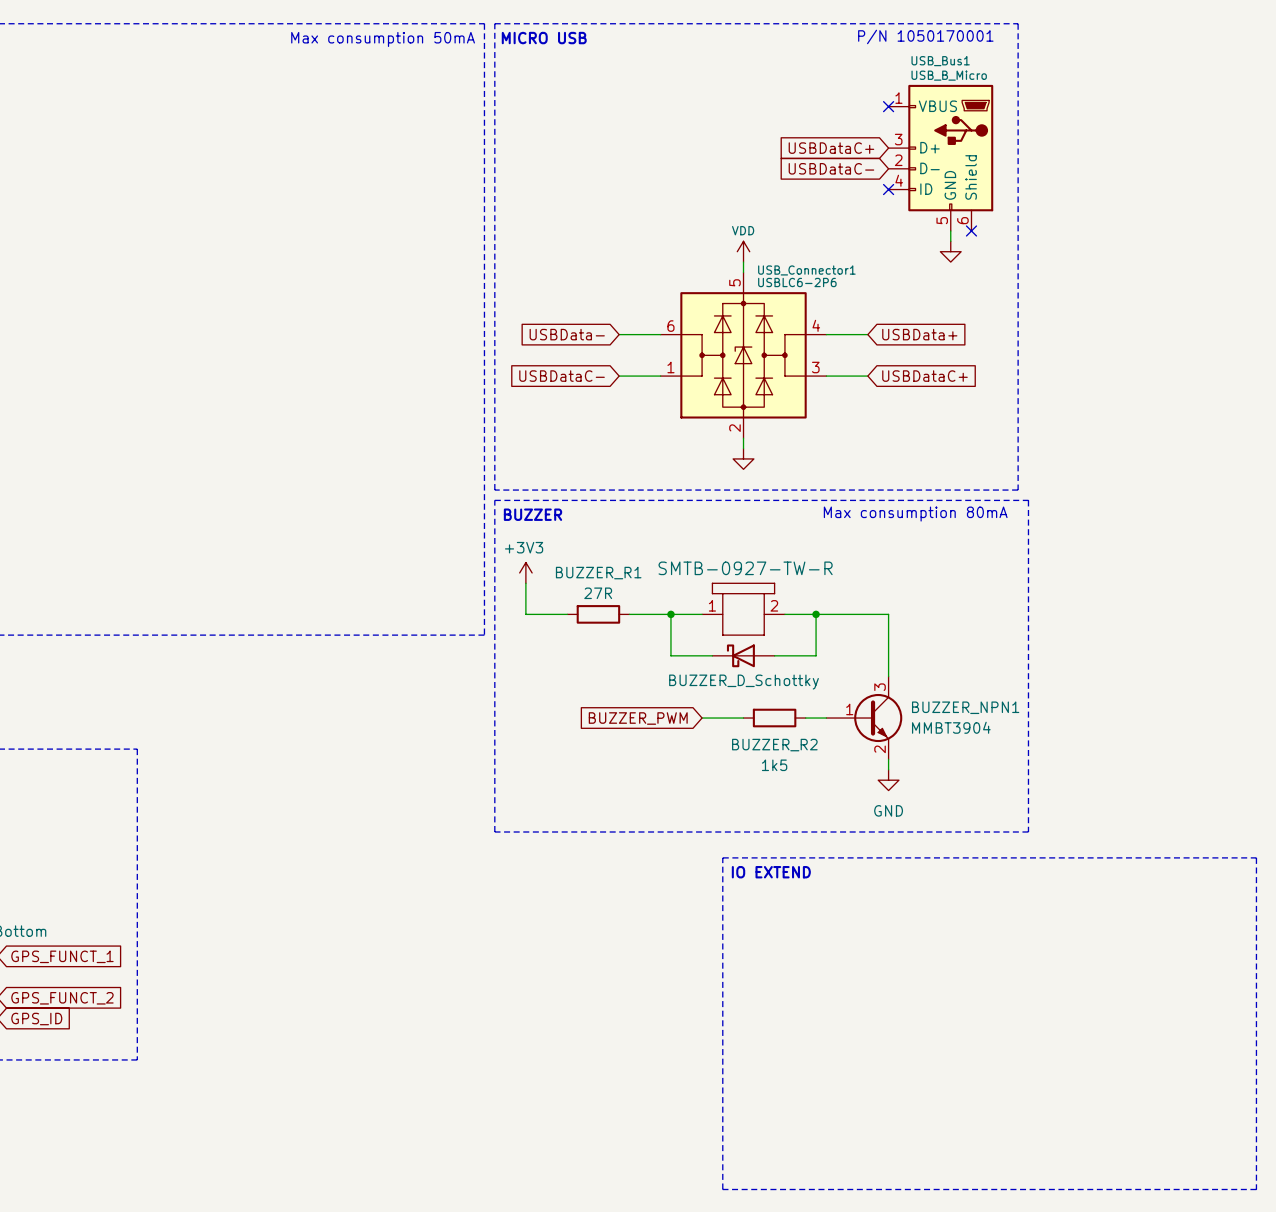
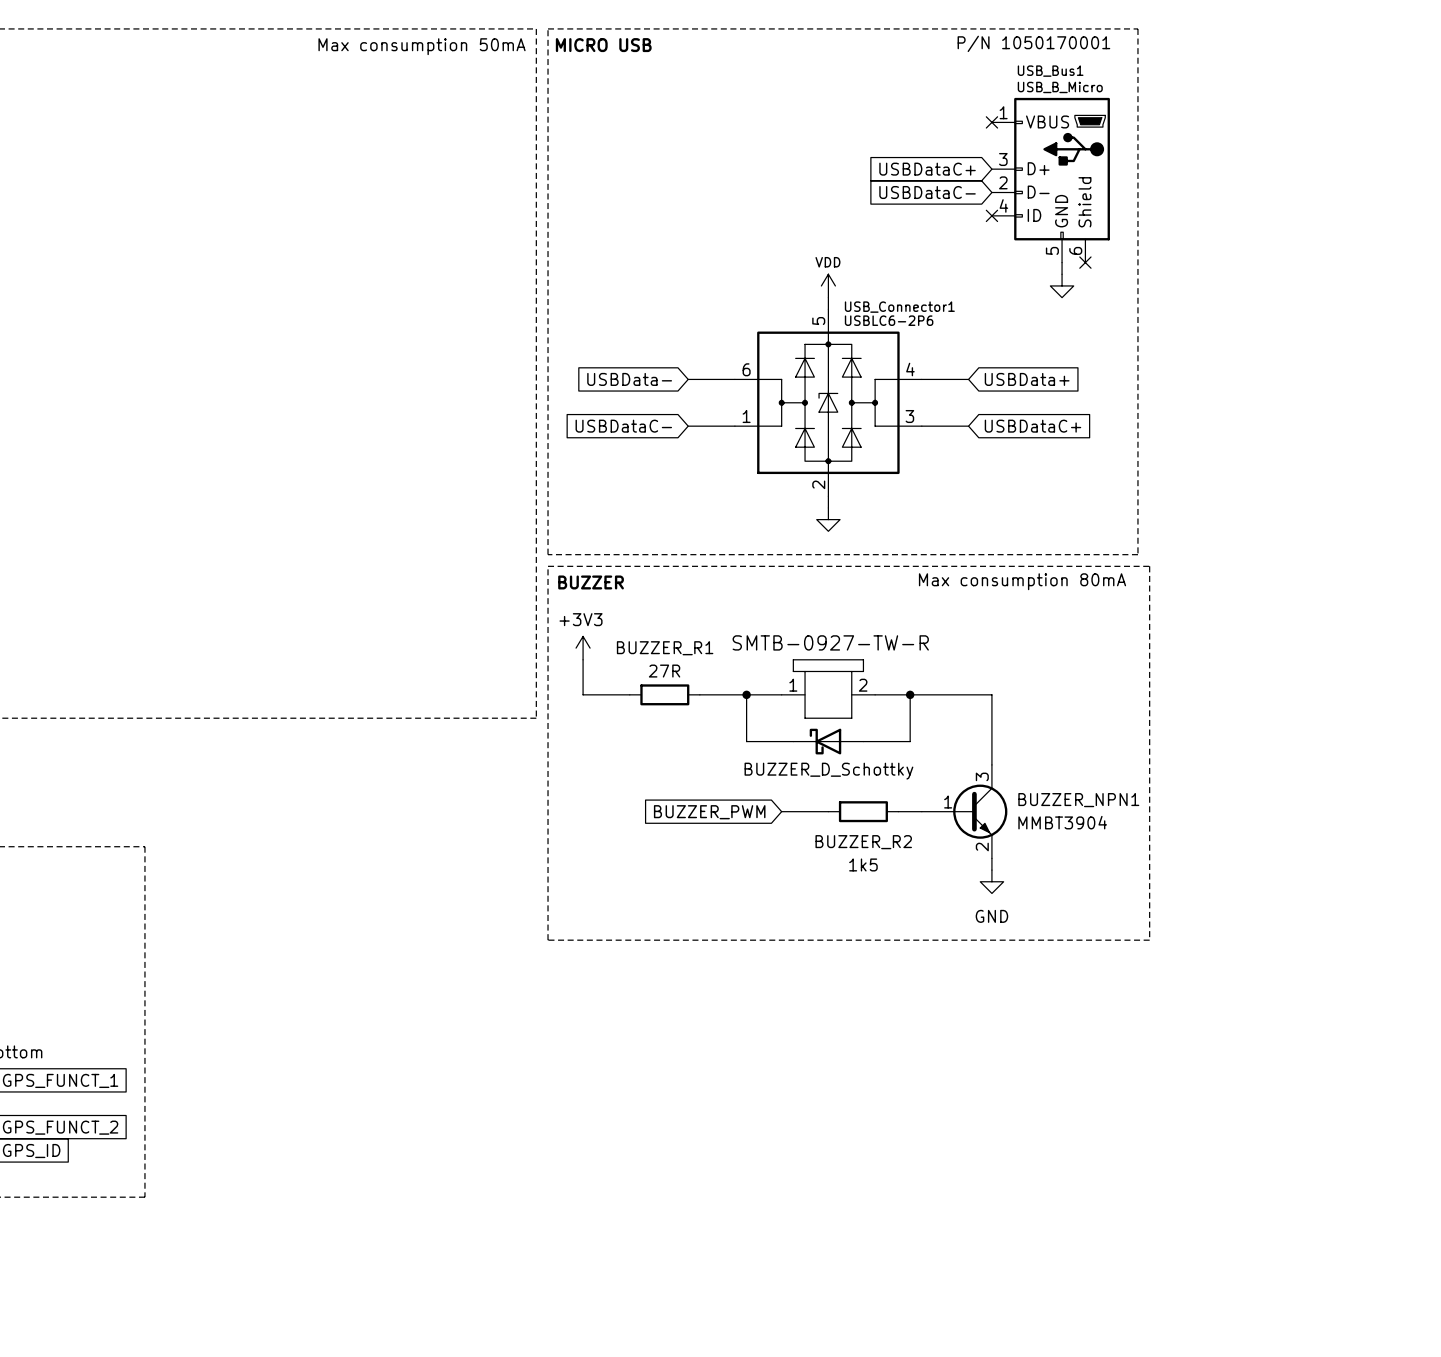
line: (722, 857) (1256, 857) (1256, 1189) (722, 1189) (722, 857) -> none
text: IO EXTEND (771, 872) -> none

